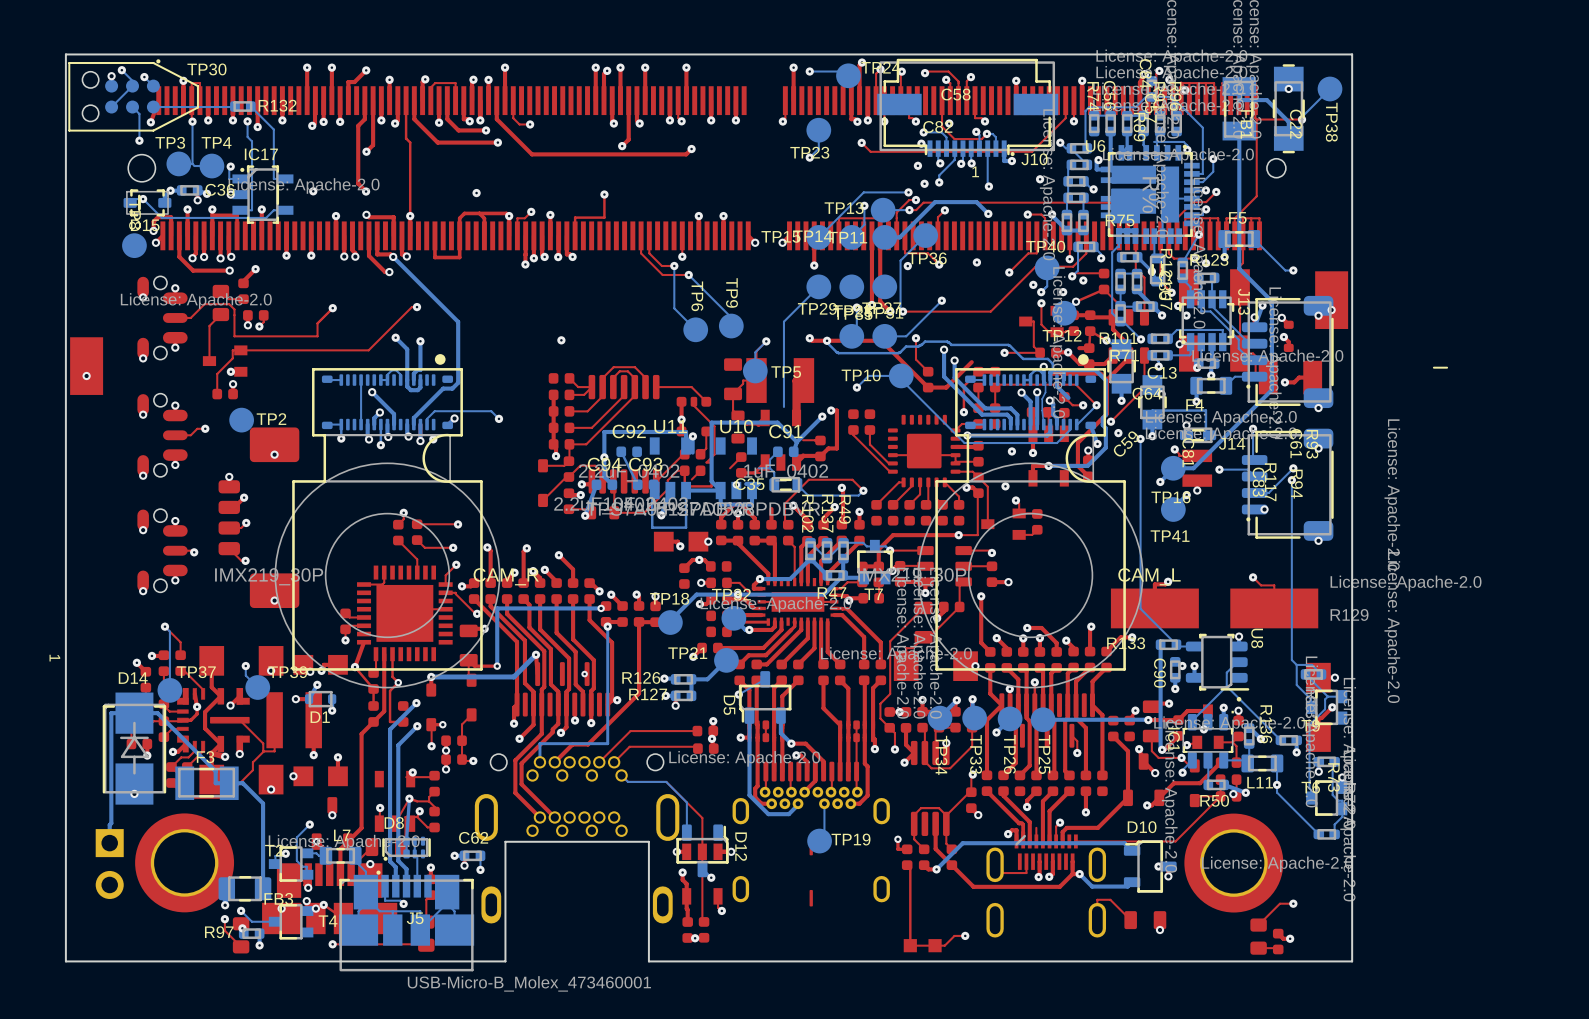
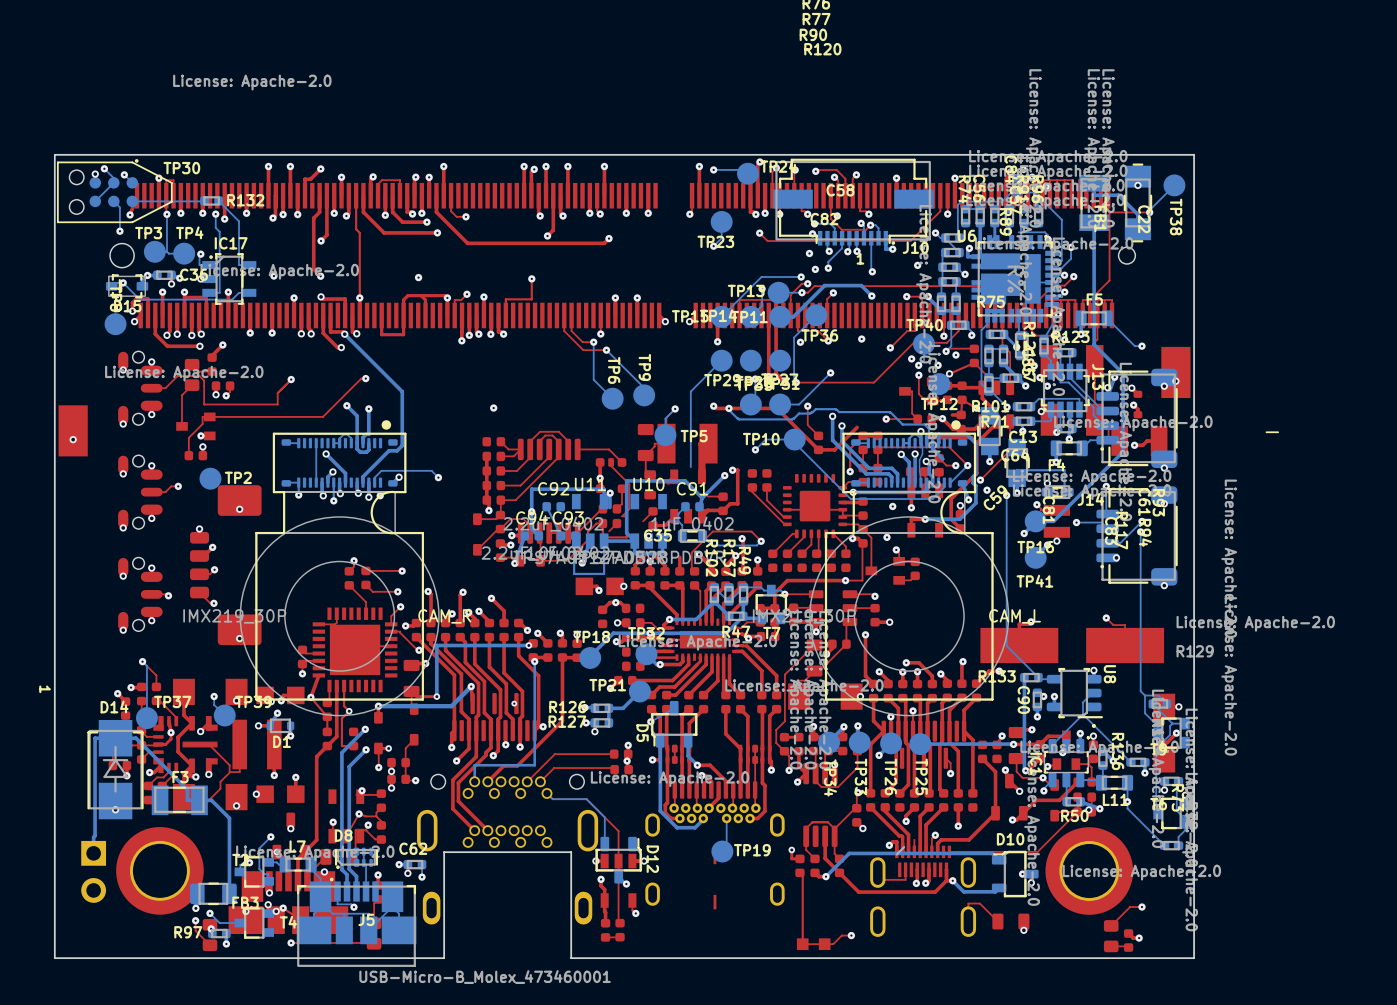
via: (899, 711) -> none
bottom track: (409, 798) (406, 841) -> none
via: (695, 938) -> none

